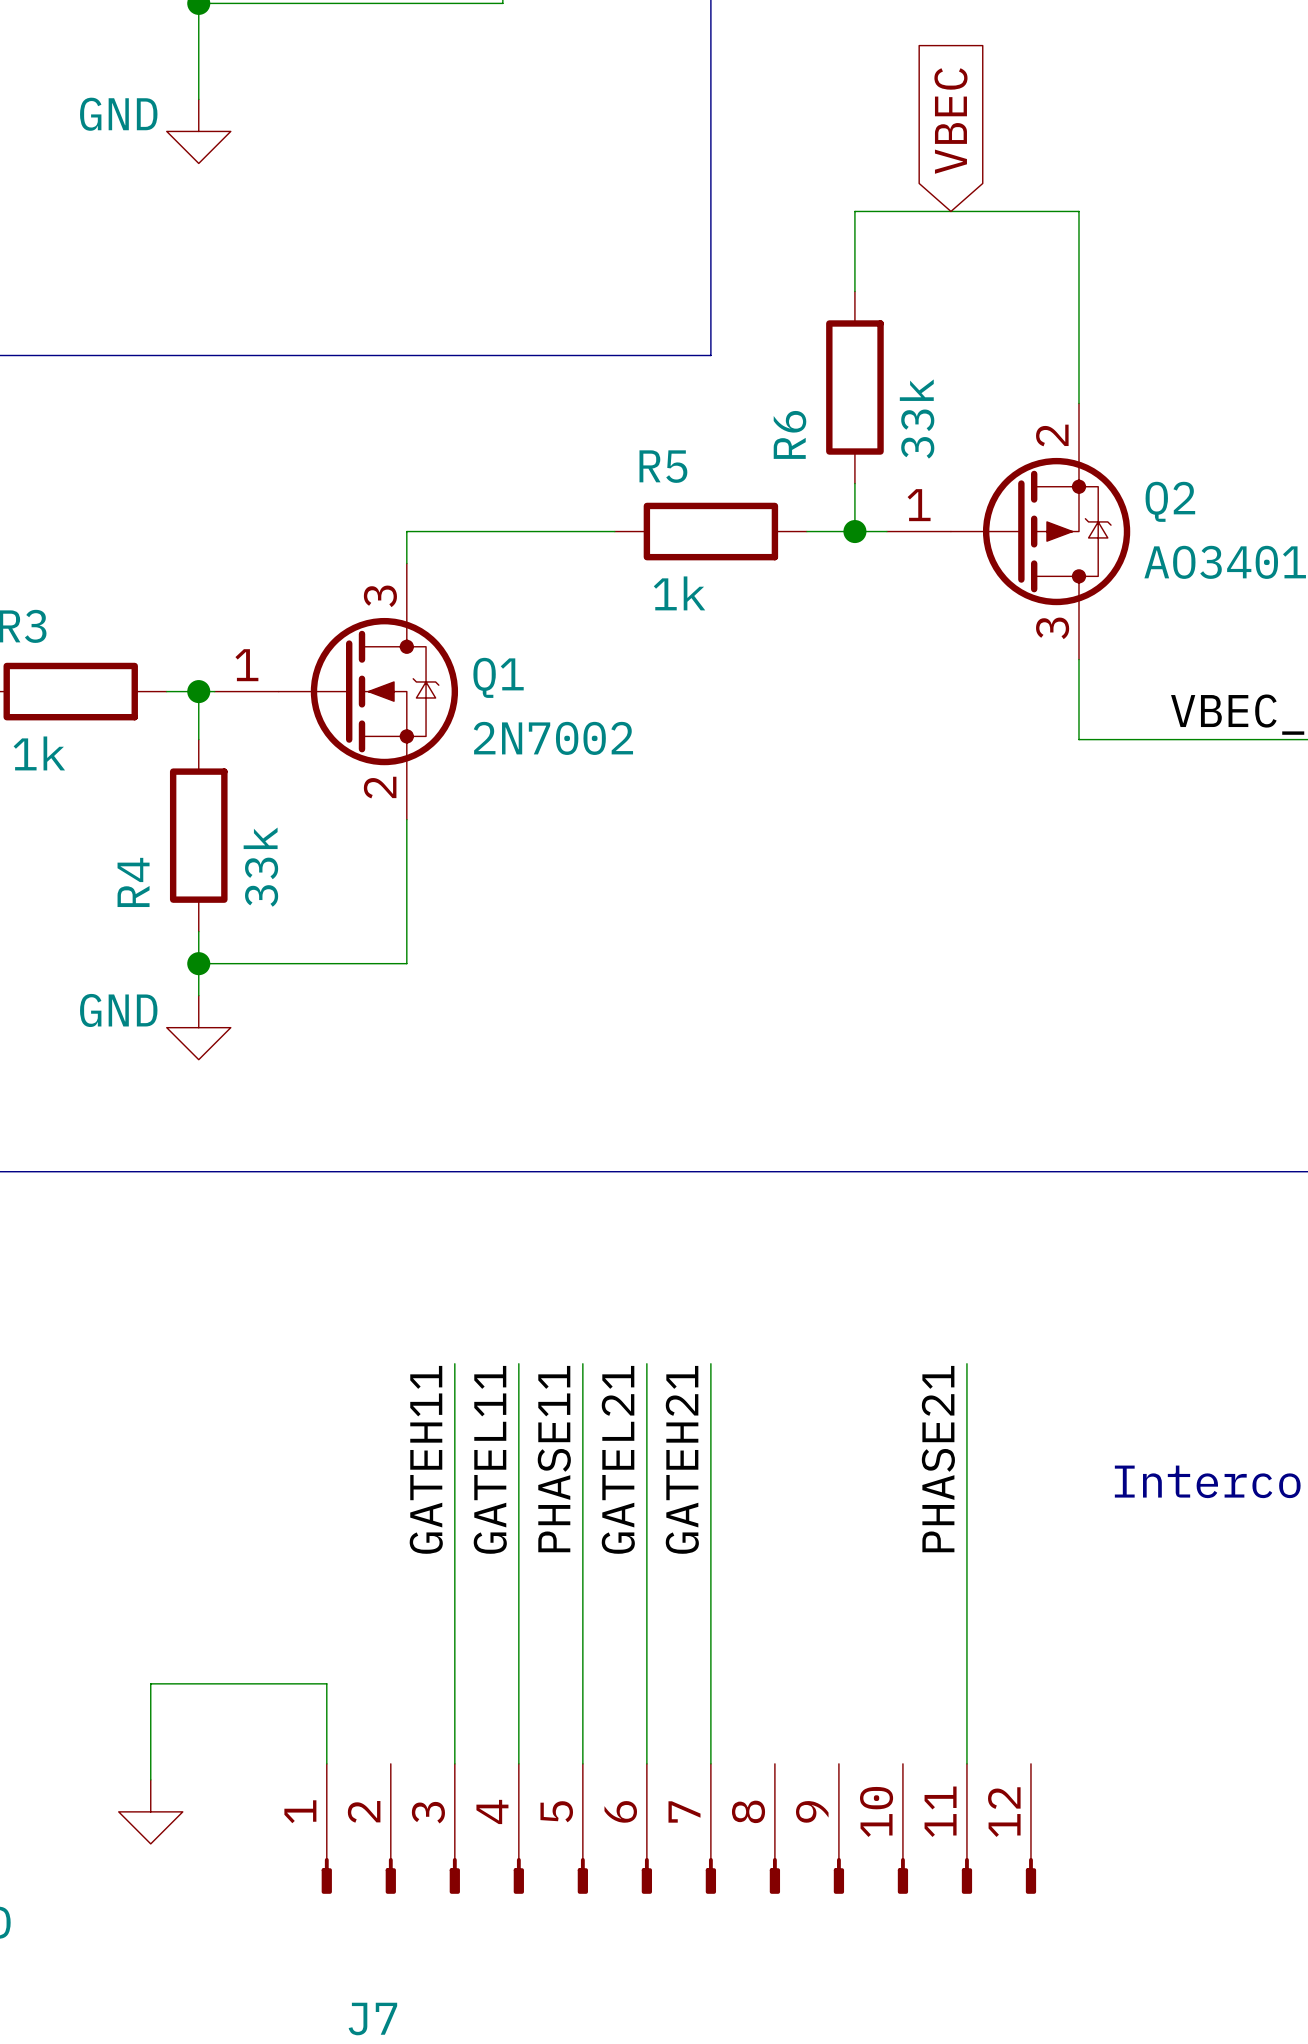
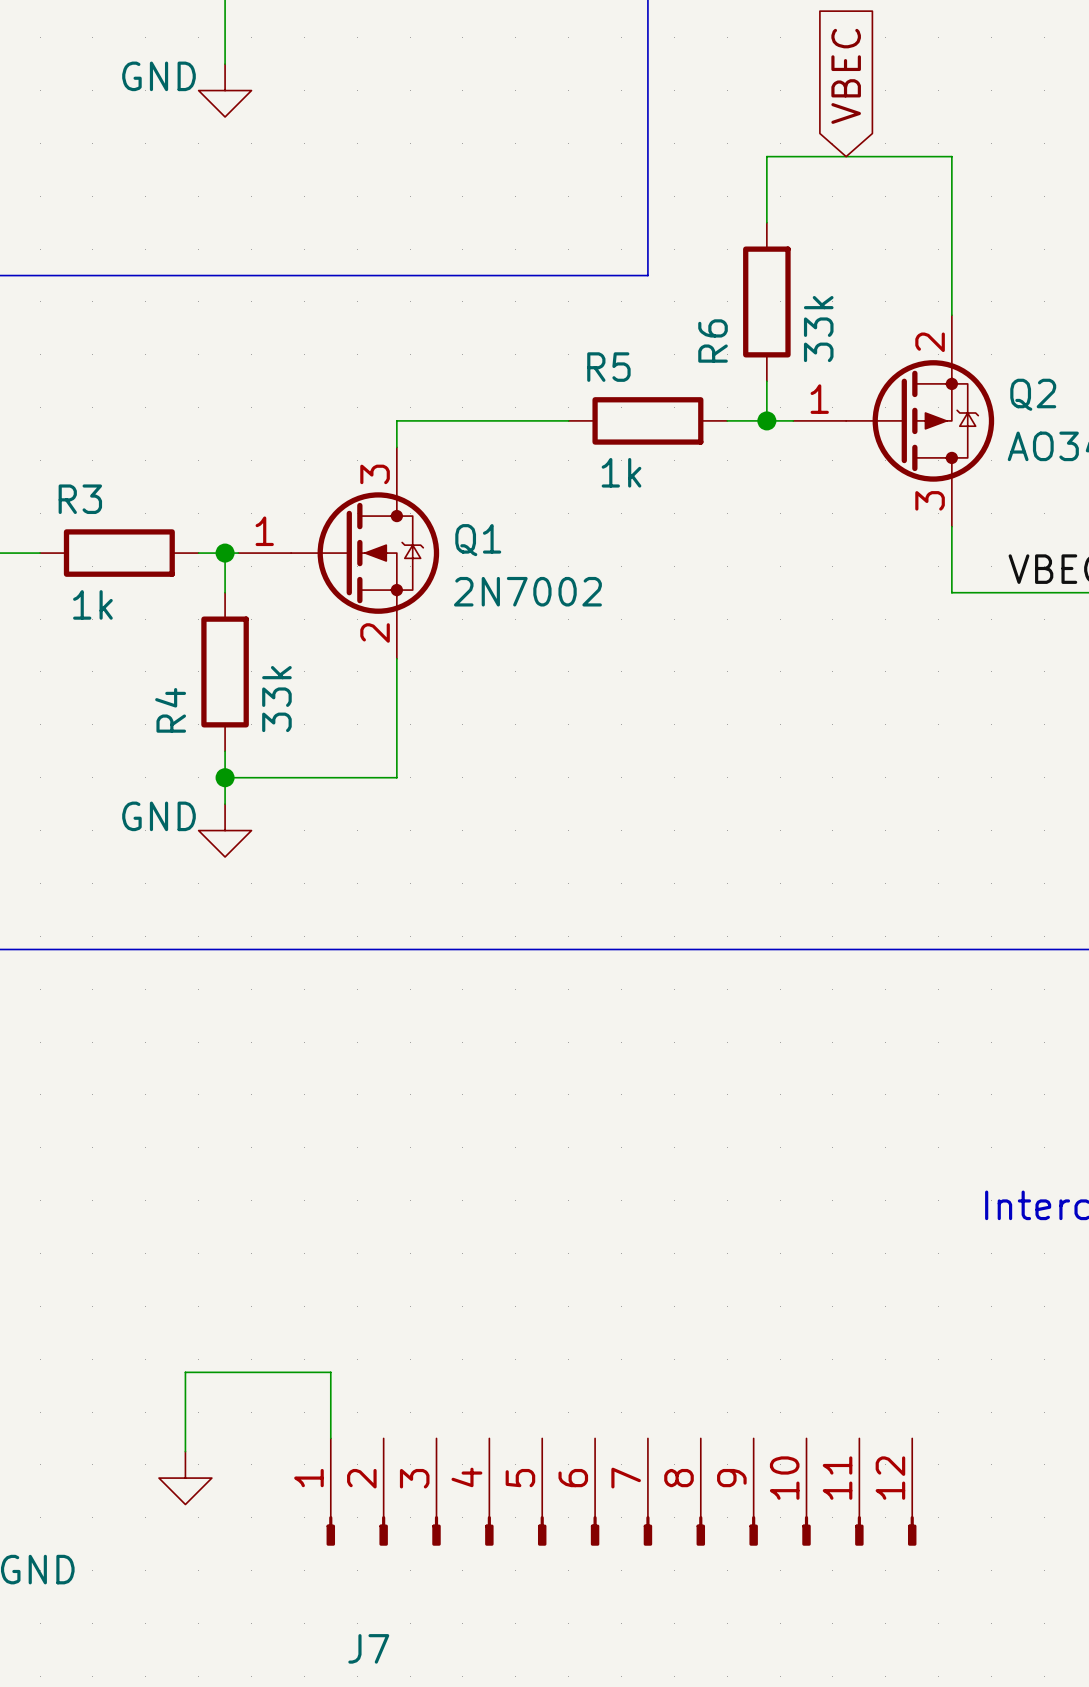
wire: (454, 1363) (454, 1763) -> none
wire: (518, 1363) (518, 1763) -> none
wire: (582, 1363) (582, 1763) -> none
wire: (646, 1363) (646, 1763) -> none
wire: (710, 1363) (710, 1763) -> none
wire: (966, 1363) (966, 1763) -> none
label: GATEH11 (426, 1459) -> none
label: GATEL11 (490, 1459) -> none
label: PHASE11 (554, 1459) -> none
label: GATEL21 (618, 1459) -> none
label: GATEH21 (682, 1459) -> none
label: PHASE21 (938, 1459) -> none

